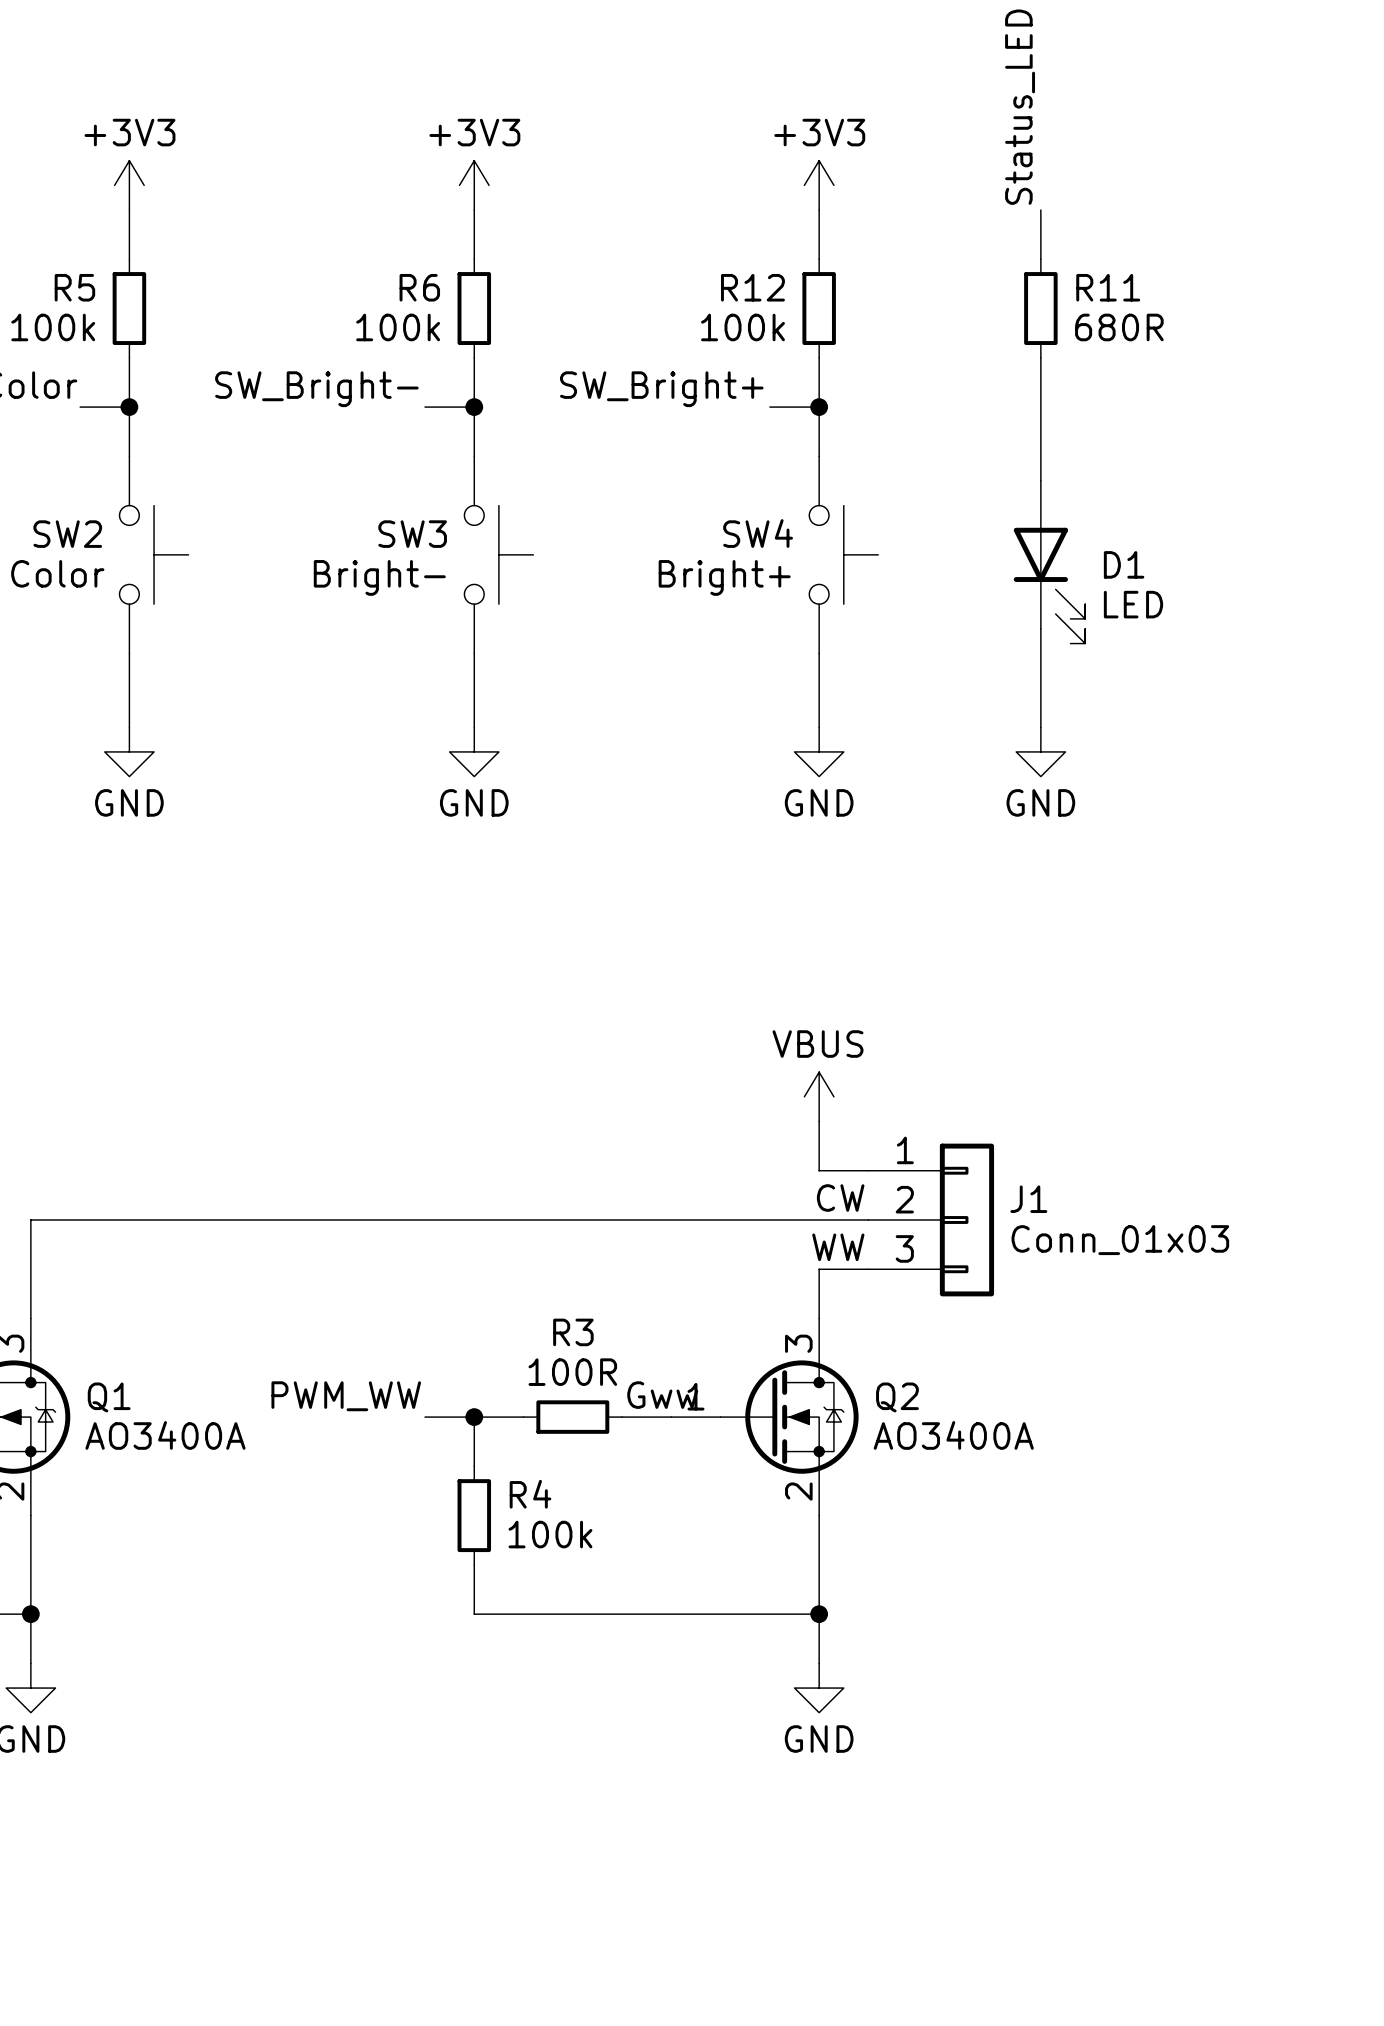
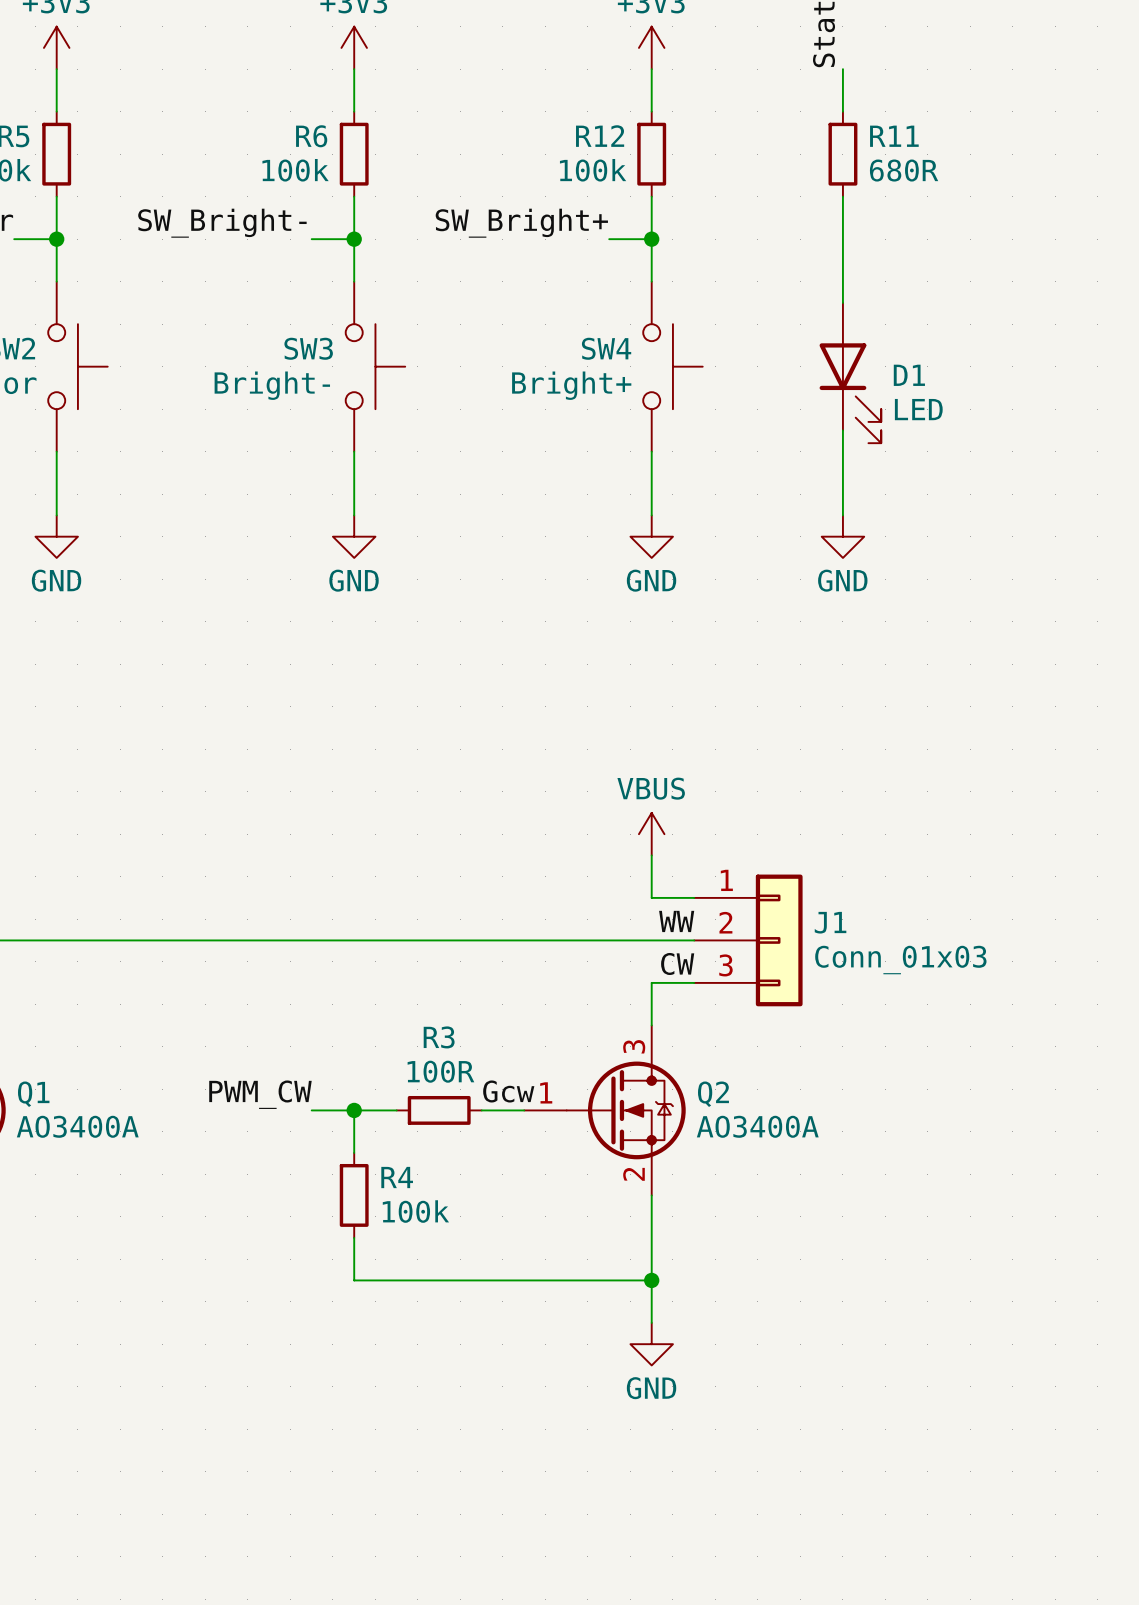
label: CW (840, 1198) -> WW (676, 921)
label: WW (838, 1247) -> CW (677, 963)
label: Gww (662, 1395) -> Gcw (508, 1091)
label: PWM_WW (346, 1396) -> PWM_CW (260, 1094)

